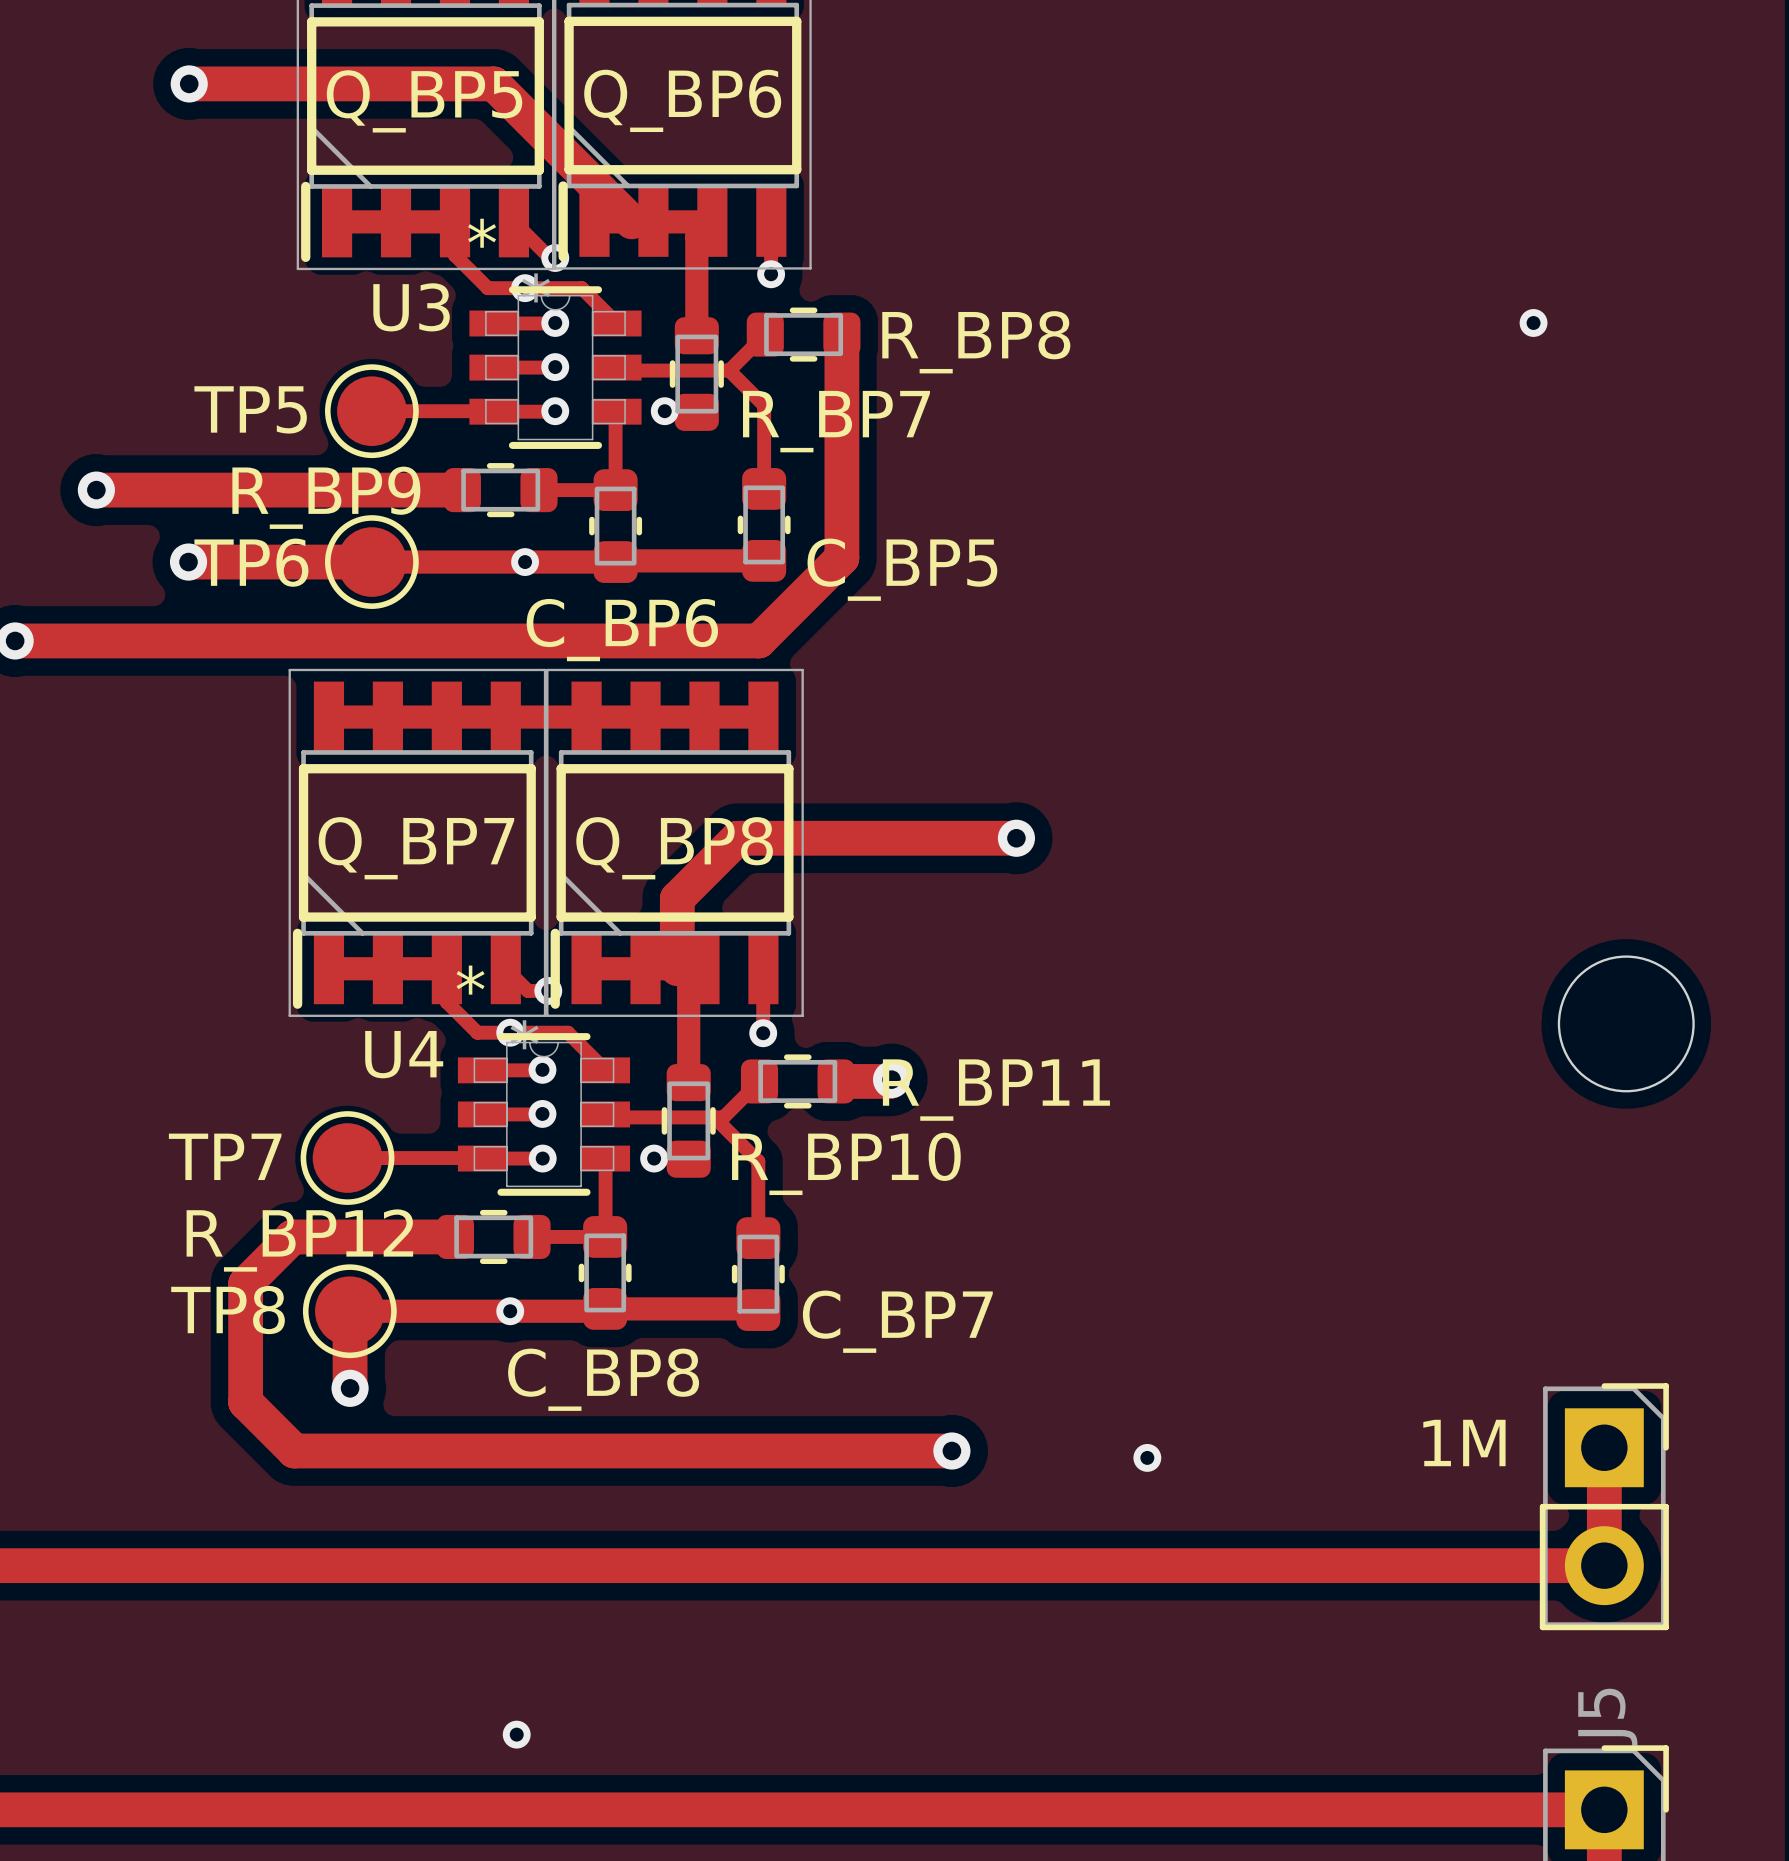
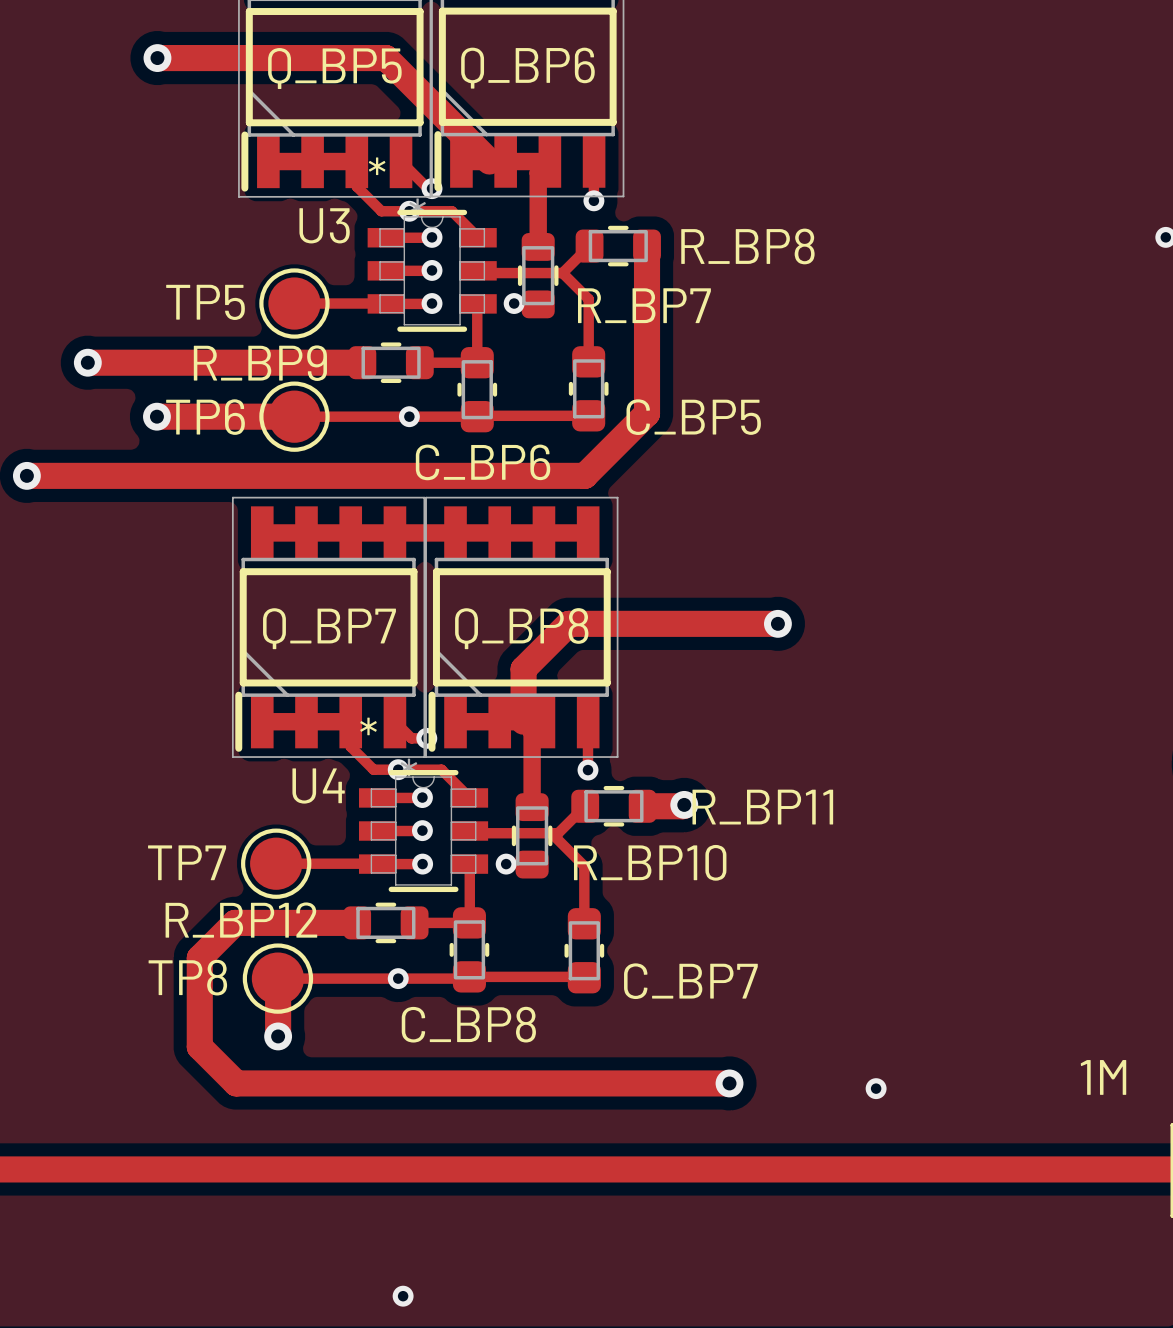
track width: thick (623, 560) (764, 560) -> thin (483, 415) (588, 415)
track width: thick (371, 562) (615, 562) -> thin (294, 416) (477, 416)
track width: thick (605, 1308) (757, 1308) -> thin (469, 976) (583, 976)
track width: thick (349, 1311) (602, 1311) -> thin (277, 978) (467, 978)

